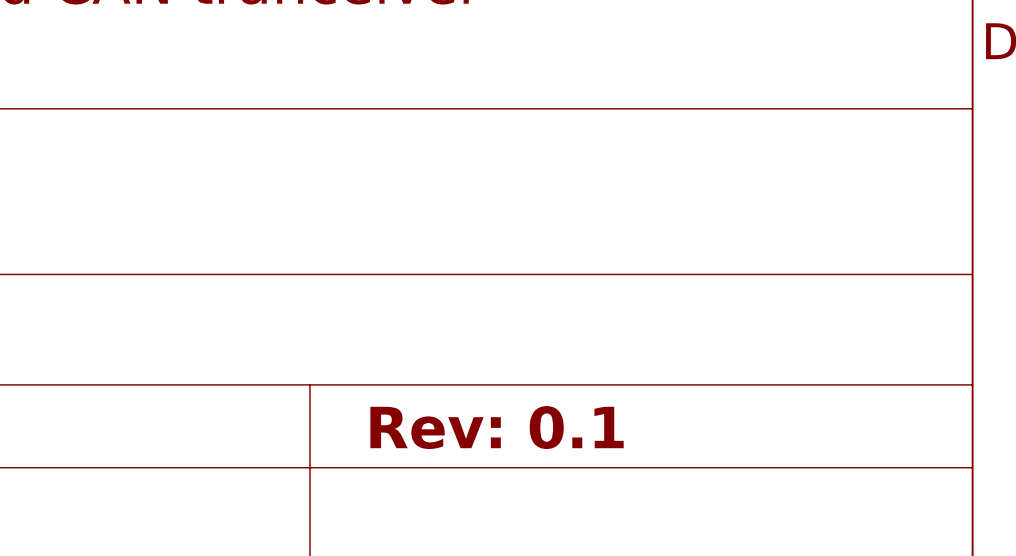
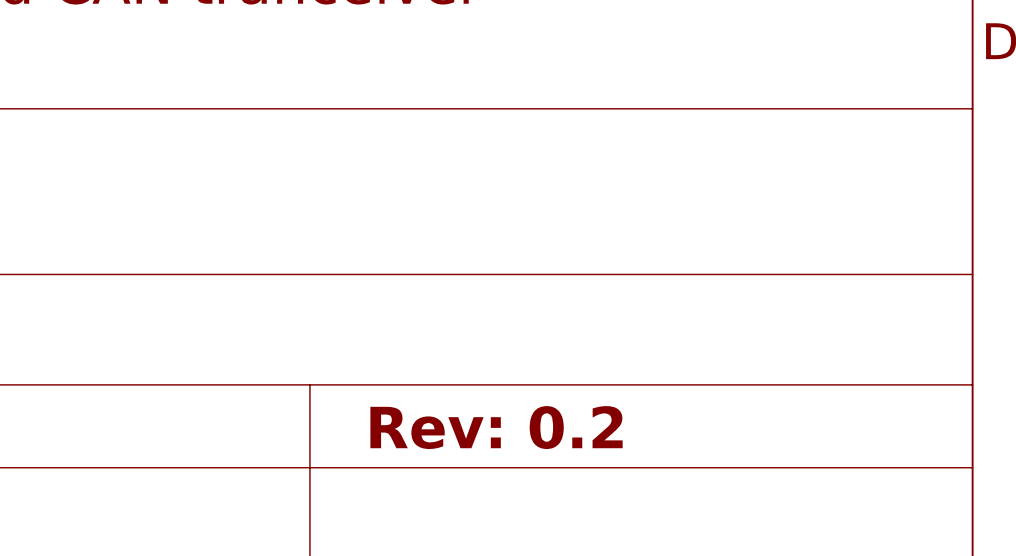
title block: Rev: 0.1 (497, 427) -> Rev: 0.2 (496, 427)

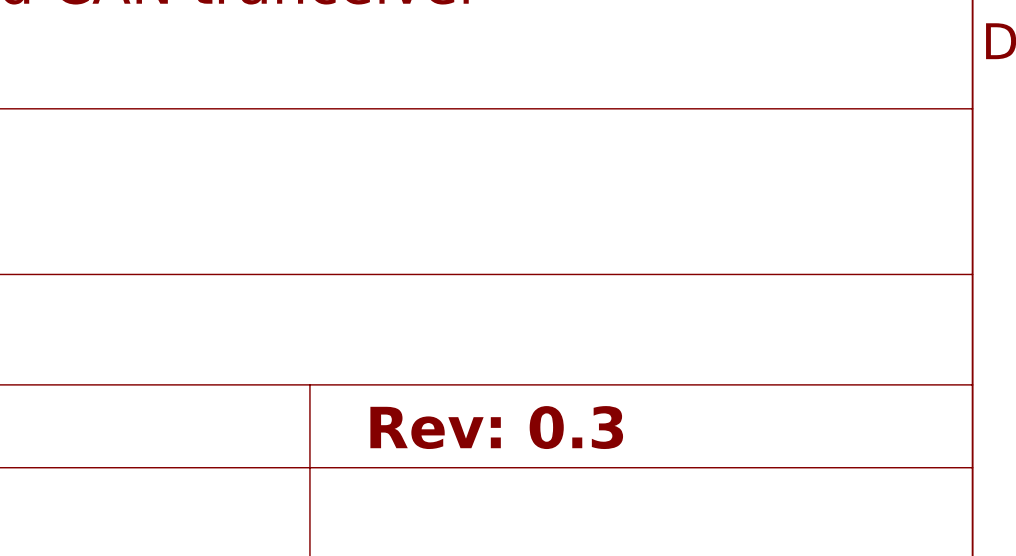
title block: Rev: 0.2 (496, 427) -> Rev: 0.3 (496, 427)

